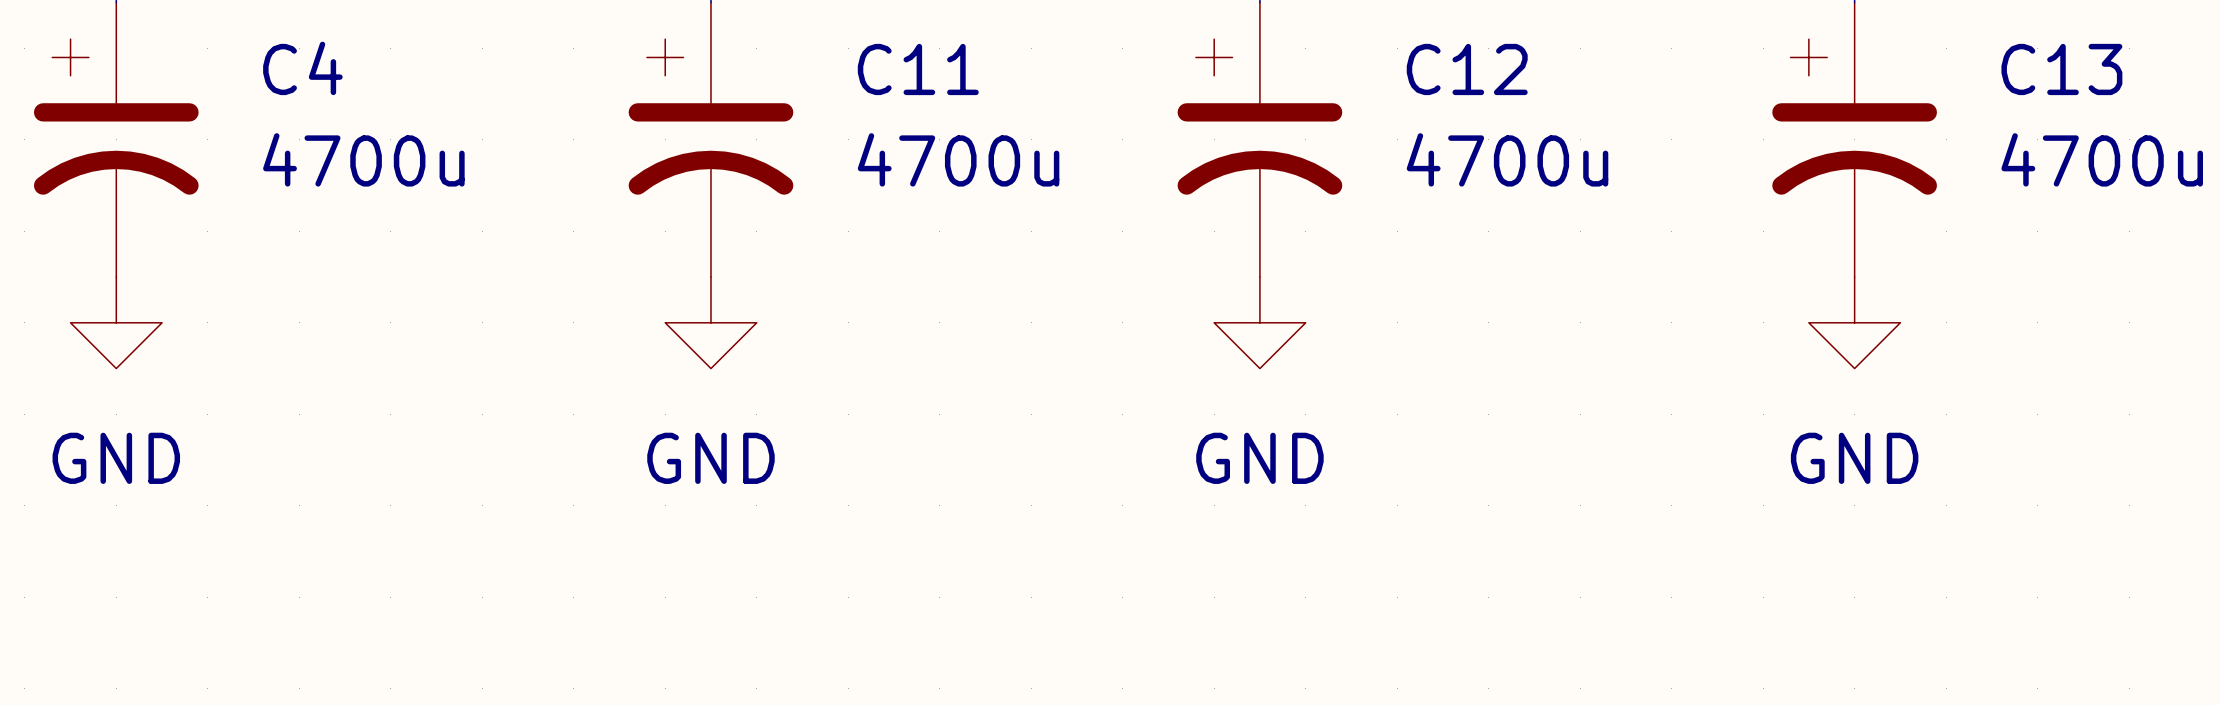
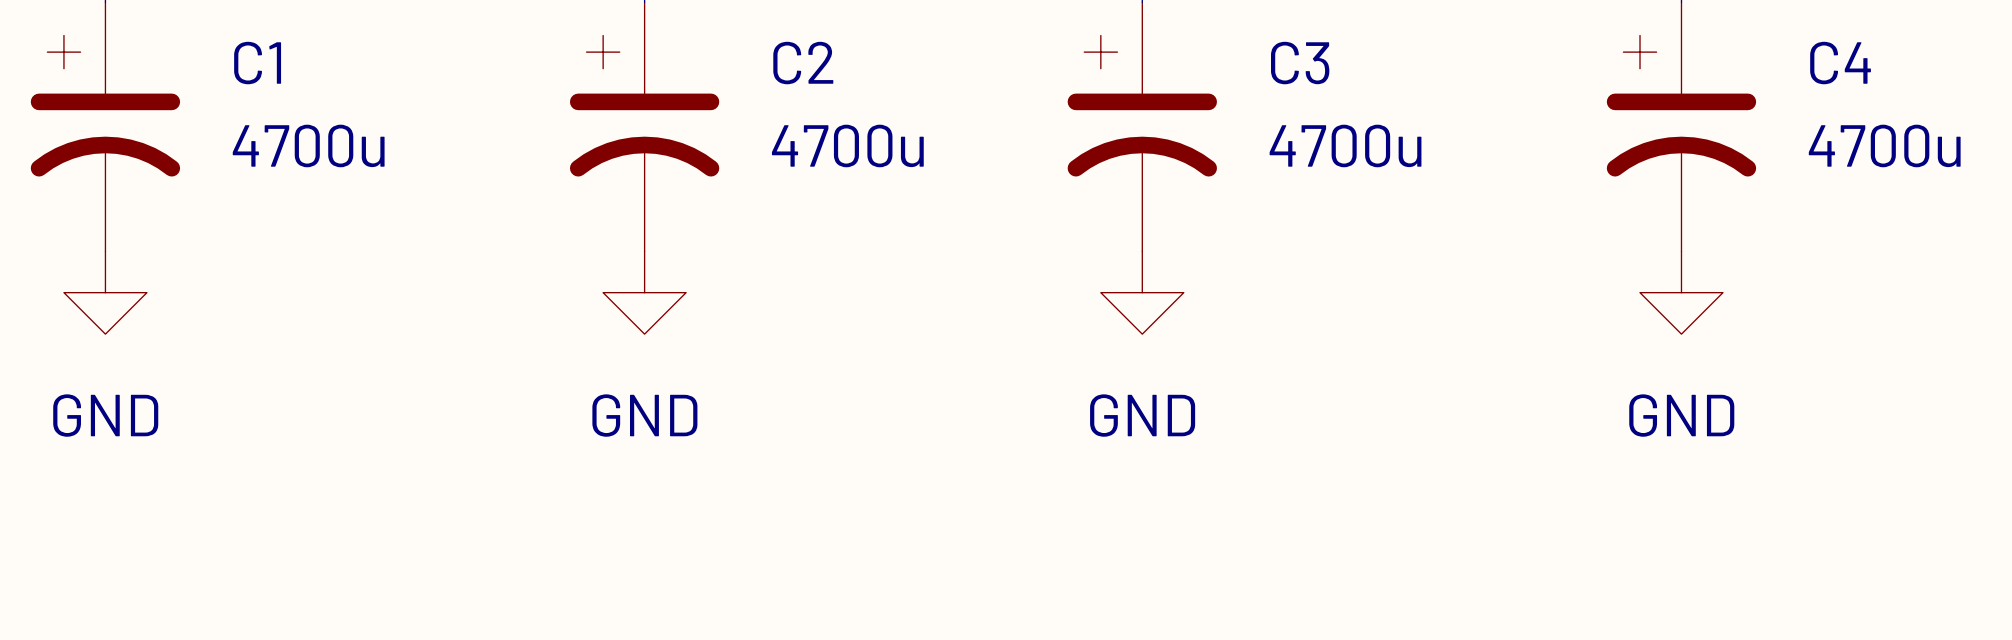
C4 name: C4 (302, 68) -> C1 (257, 63)
C11 name: C11 (918, 69) -> C2 (803, 63)
C12 name: C12 (1467, 69) -> C3 (1300, 63)
C13 name: C13 (2061, 69) -> C4 (1840, 63)

